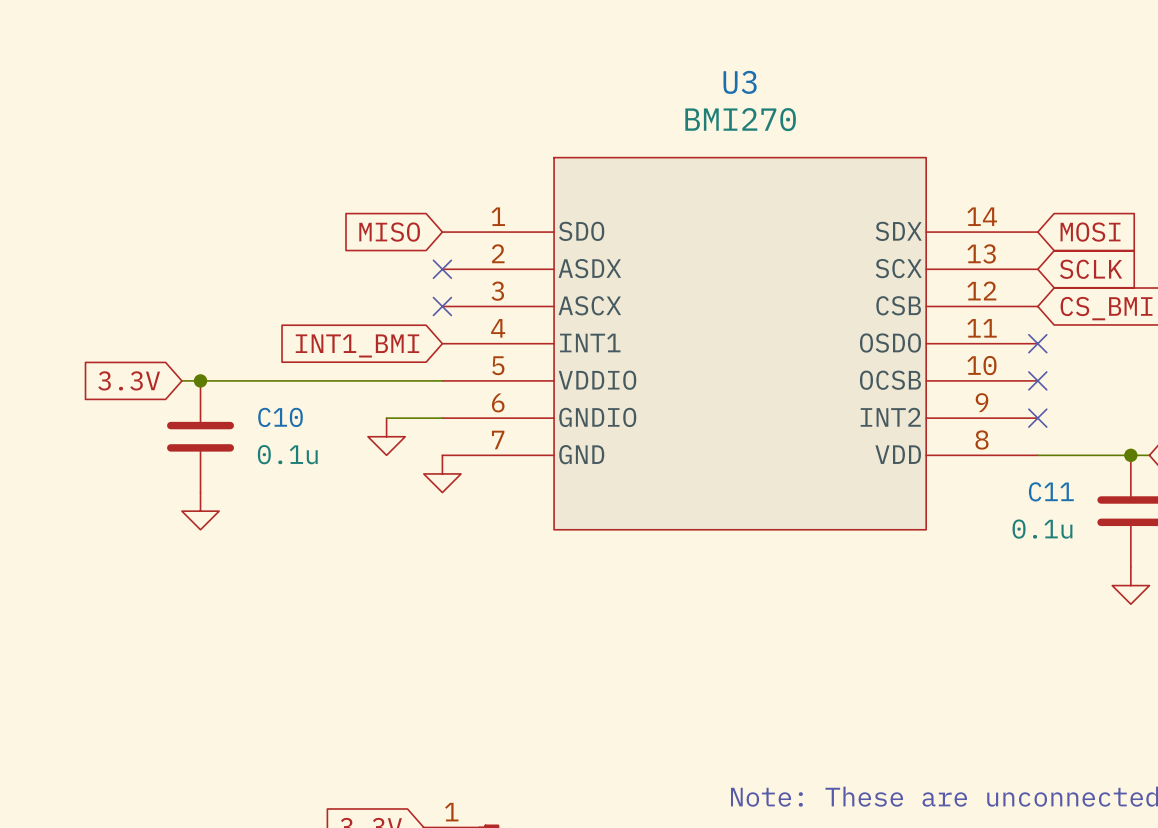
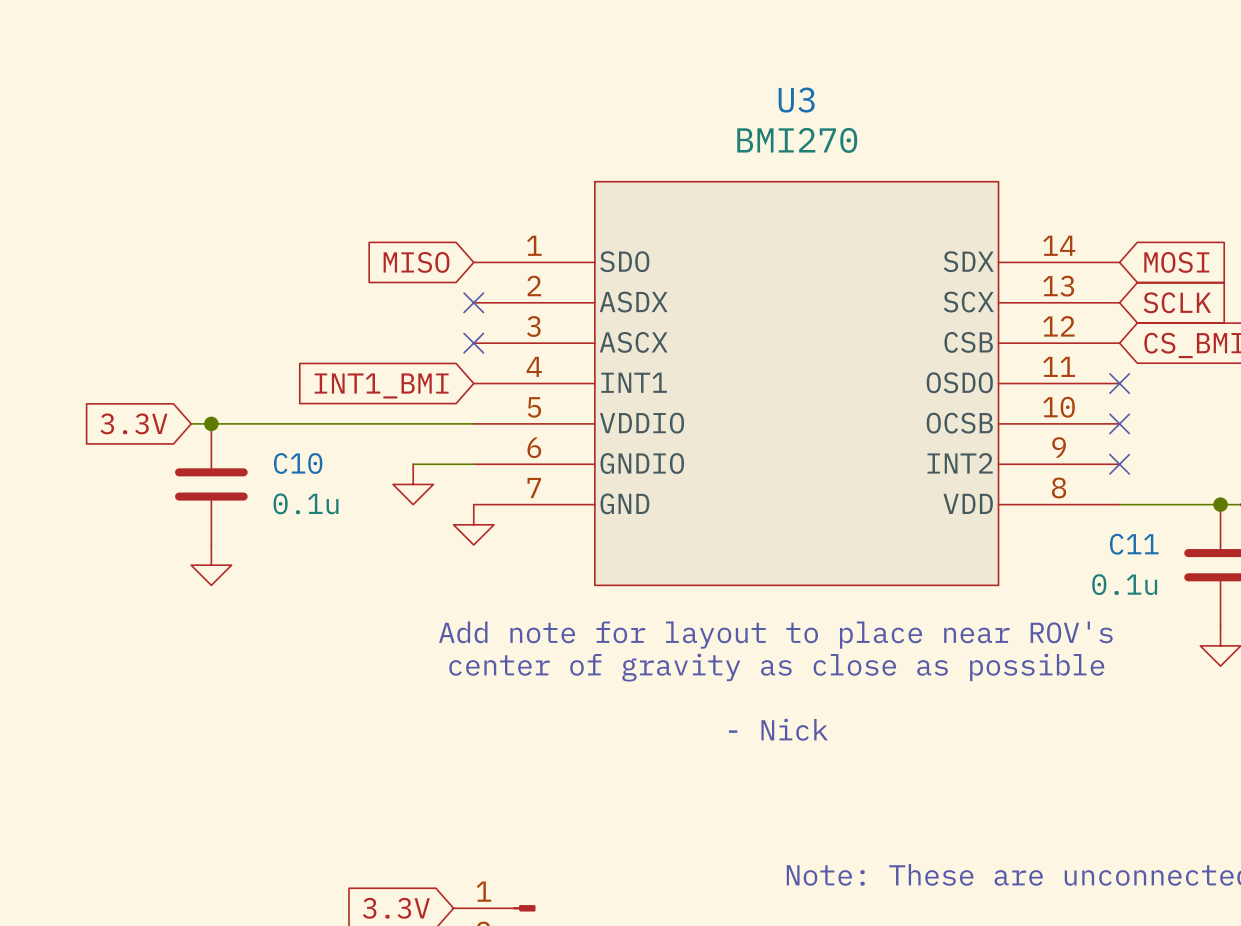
text: none -> Add note for layout to place near ROV's (775, 635)
text: none -> center of gravity as close as possible (776, 667)
text: none -> - Nick (778, 729)

